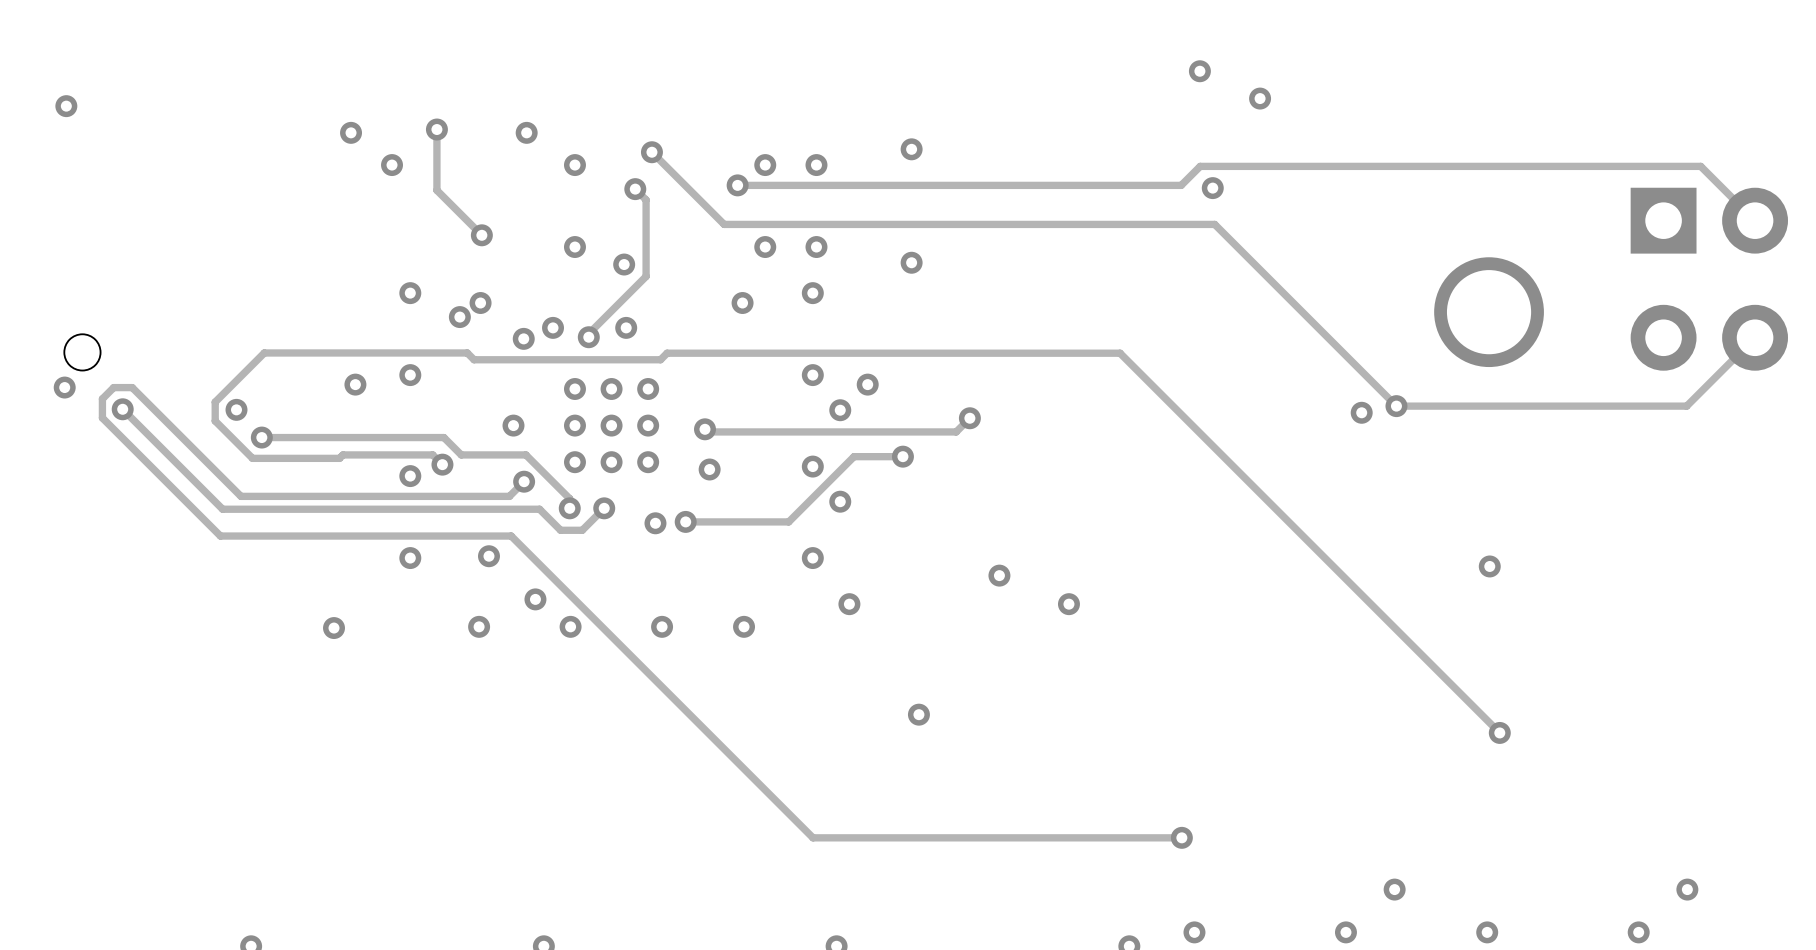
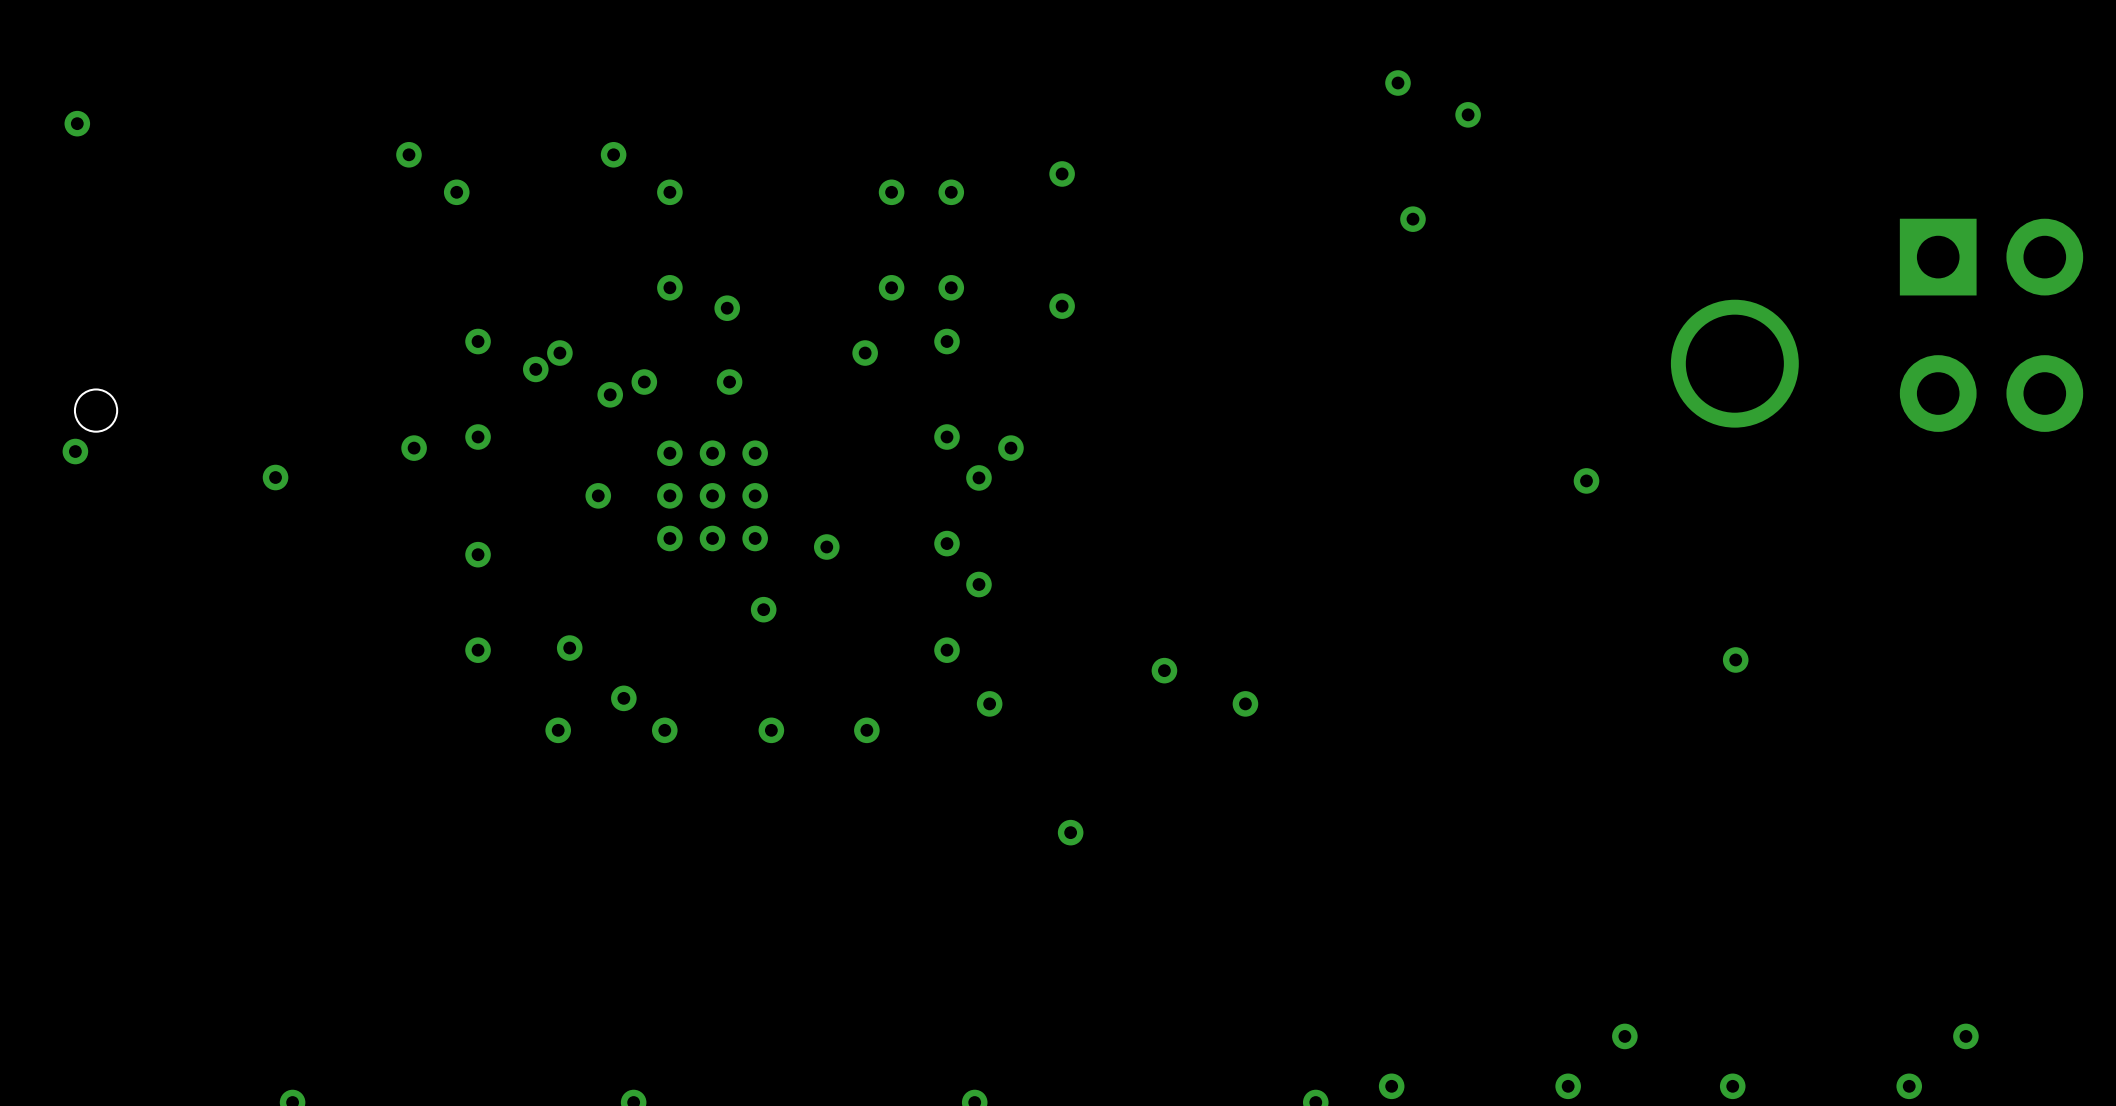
track: (436, 129) (436, 190) (481, 235) -> none
via: (436, 129) -> none
track: (651, 152) (724, 224) (1214, 224) (1396, 406) (1686, 406) (1755, 337) -> none
via: (651, 152) -> none
track: (737, 185) (1181, 185) (1200, 166) (1700, 166) (1755, 220) -> none
via: (737, 185) -> none
track: (635, 189) (646, 199) (646, 276) (588, 333) (588, 337) -> none
via: (635, 189) -> none
via: (481, 235) -> none
via: (588, 337) -> none
via: (1396, 406) -> none
track: (122, 409) (222, 509) (539, 509) (560, 530) (582, 530) (604, 508) -> none
via: (122, 409) -> none
track: (969, 418) (956, 431) (707, 431) (704, 429) -> none
via: (969, 418) -> none
via: (704, 429) -> none
track: (261, 437) (443, 437) (461, 454) (525, 454) (569, 498) (569, 508) -> none
via: (261, 437) -> none
track: (902, 456) (854, 456) (788, 521) (685, 521) -> none
via: (902, 456) -> none
track: (442, 464) (432, 454) (342, 454) (339, 458) (252, 458) (215, 421) (215, 402) (264, 352) (467, 352) (474, 359) (660, 359) (667, 353) (1120, 353) (1499, 732) -> none
via: (442, 464) -> none
track: (524, 481) (509, 496) (241, 496) (132, 387) (113, 387) (102, 398) (102, 417) (220, 536) (511, 536) (813, 837) (1181, 837) -> none
via: (524, 481) -> none
via: (569, 508) -> none
via: (604, 508) -> none
via: (685, 521) -> none
via: (334, 628) -> none
via: (1499, 732) -> none
via: (1181, 837) -> none

